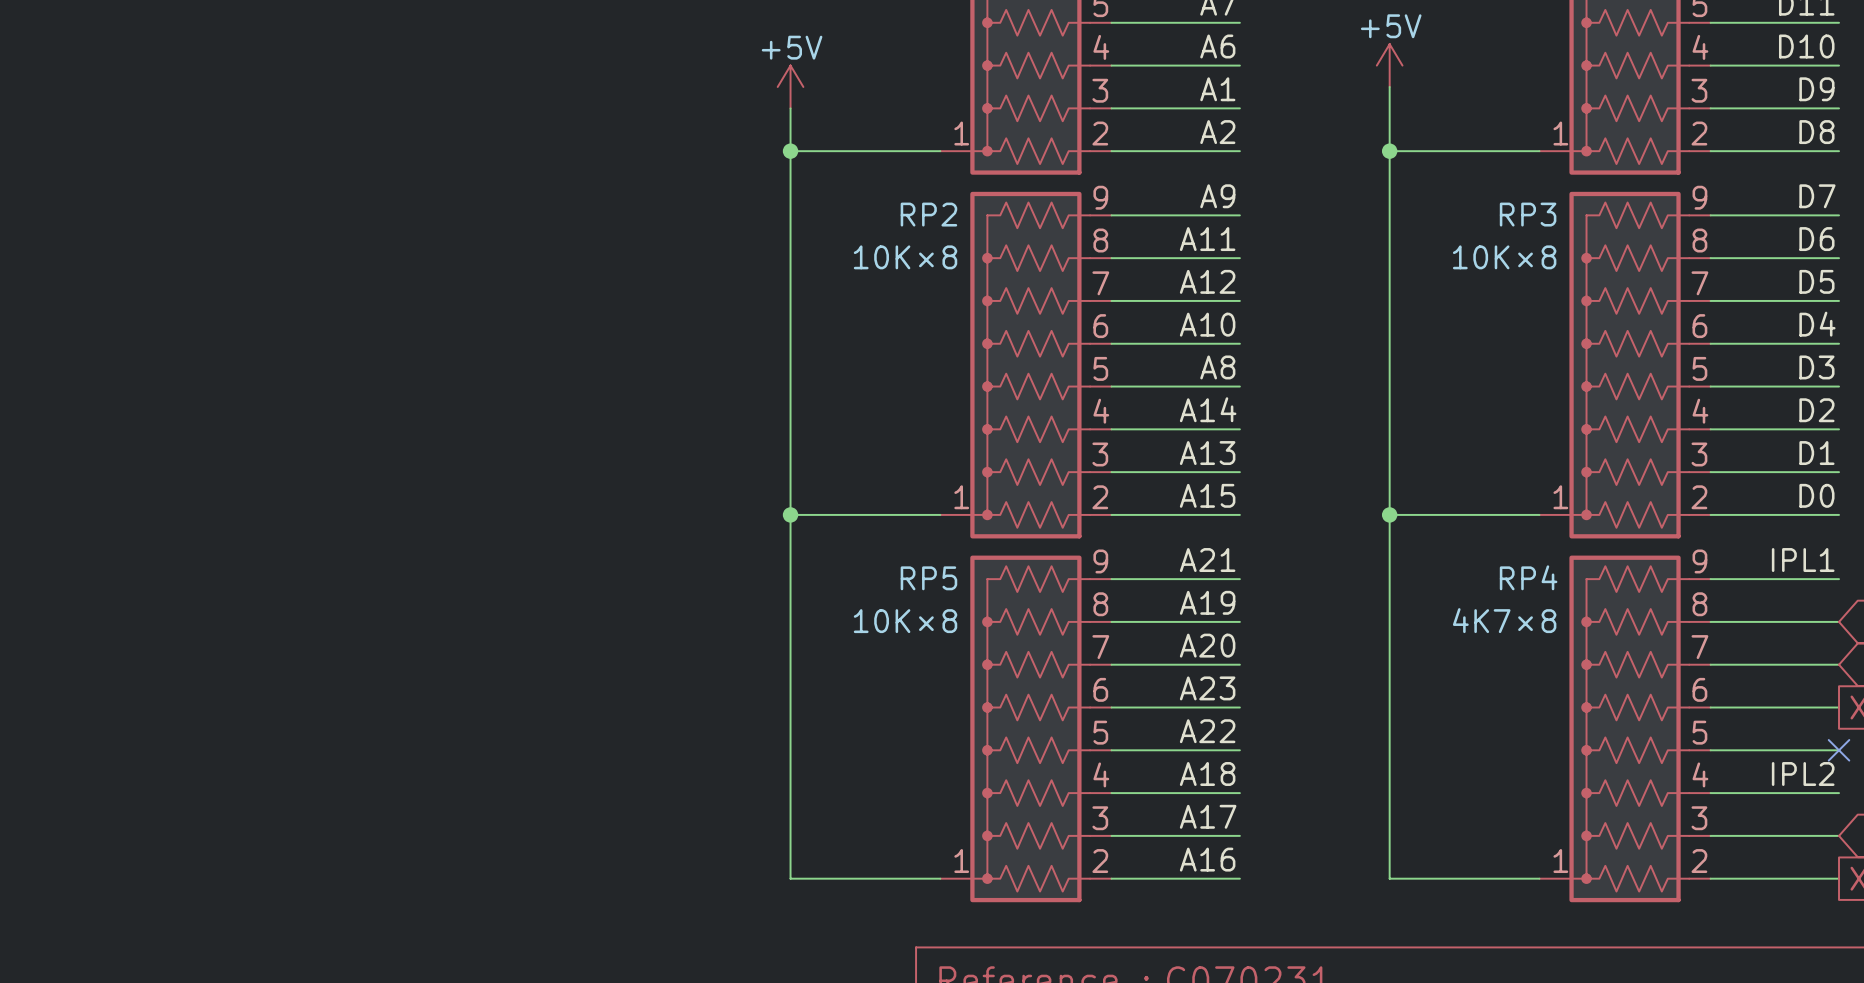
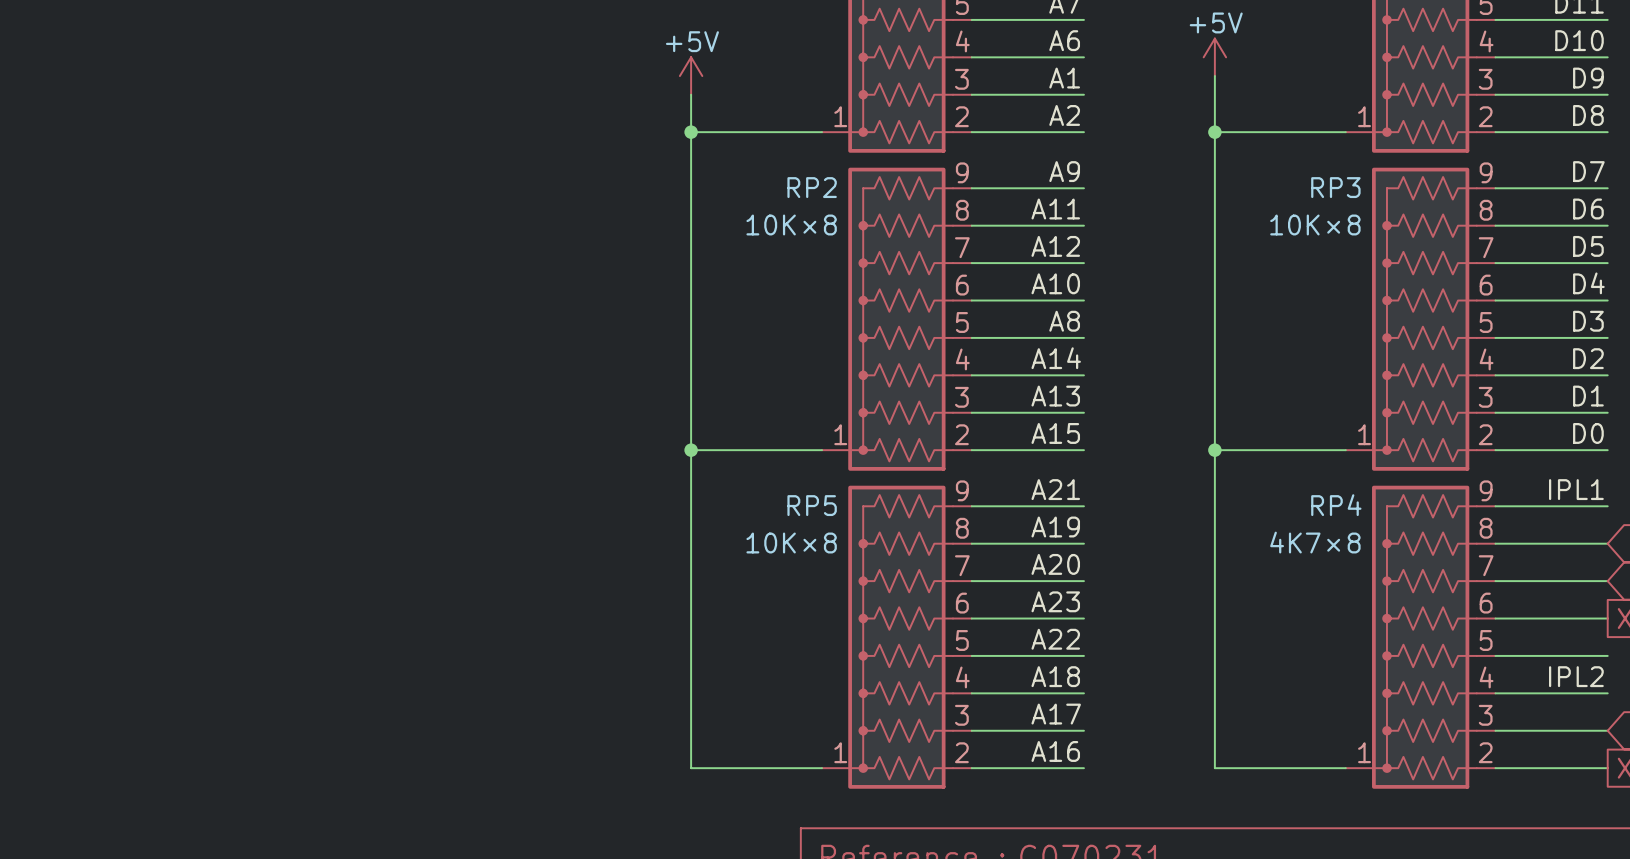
no-connect mark: (1839, 750) -> none

